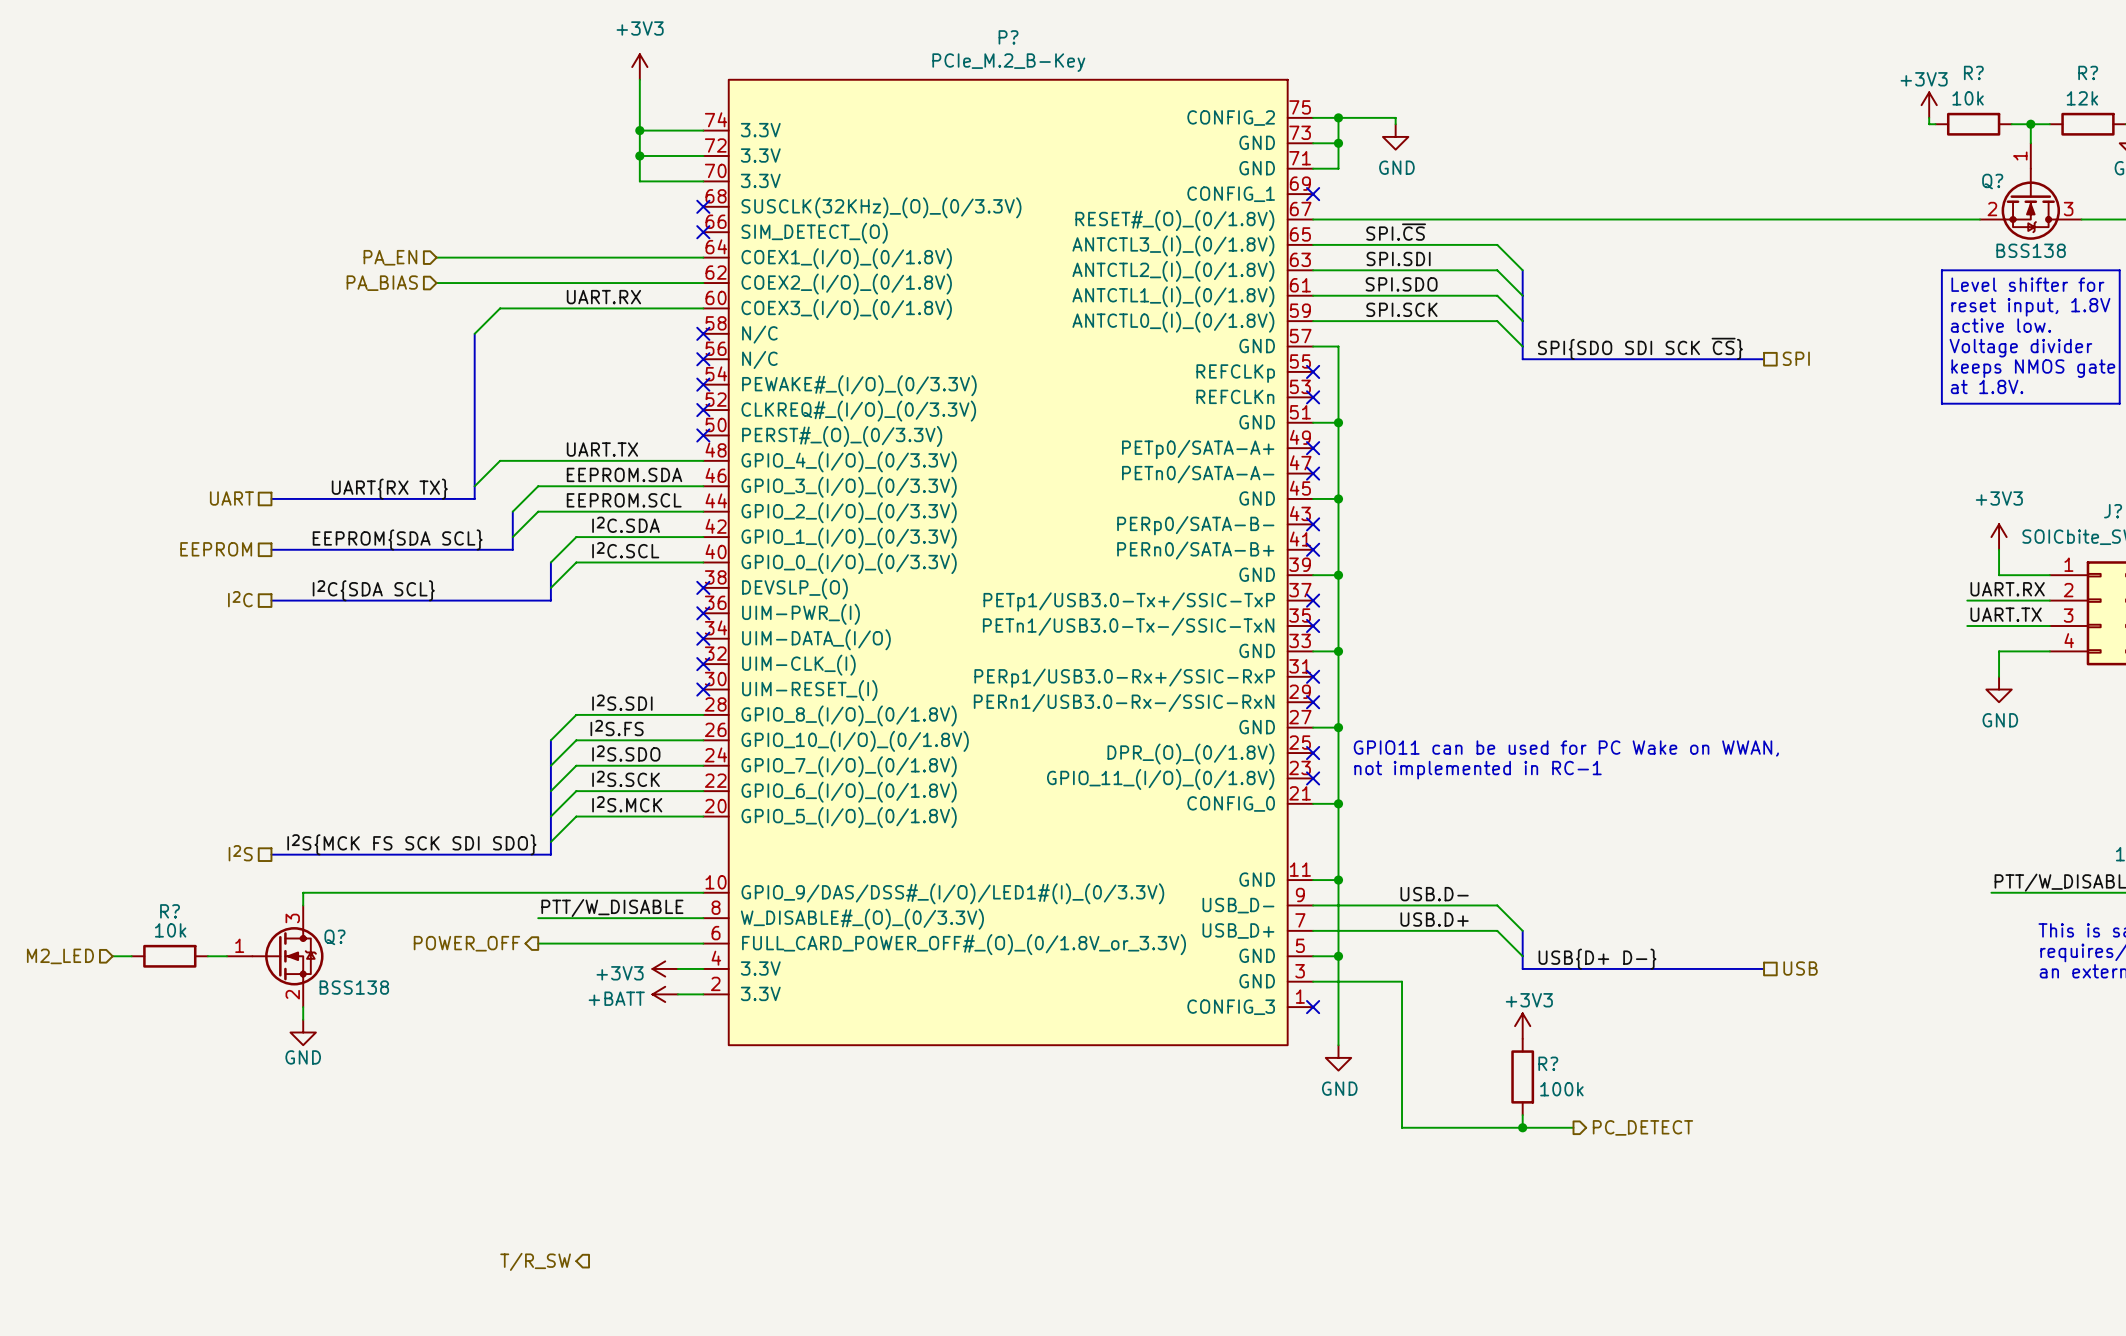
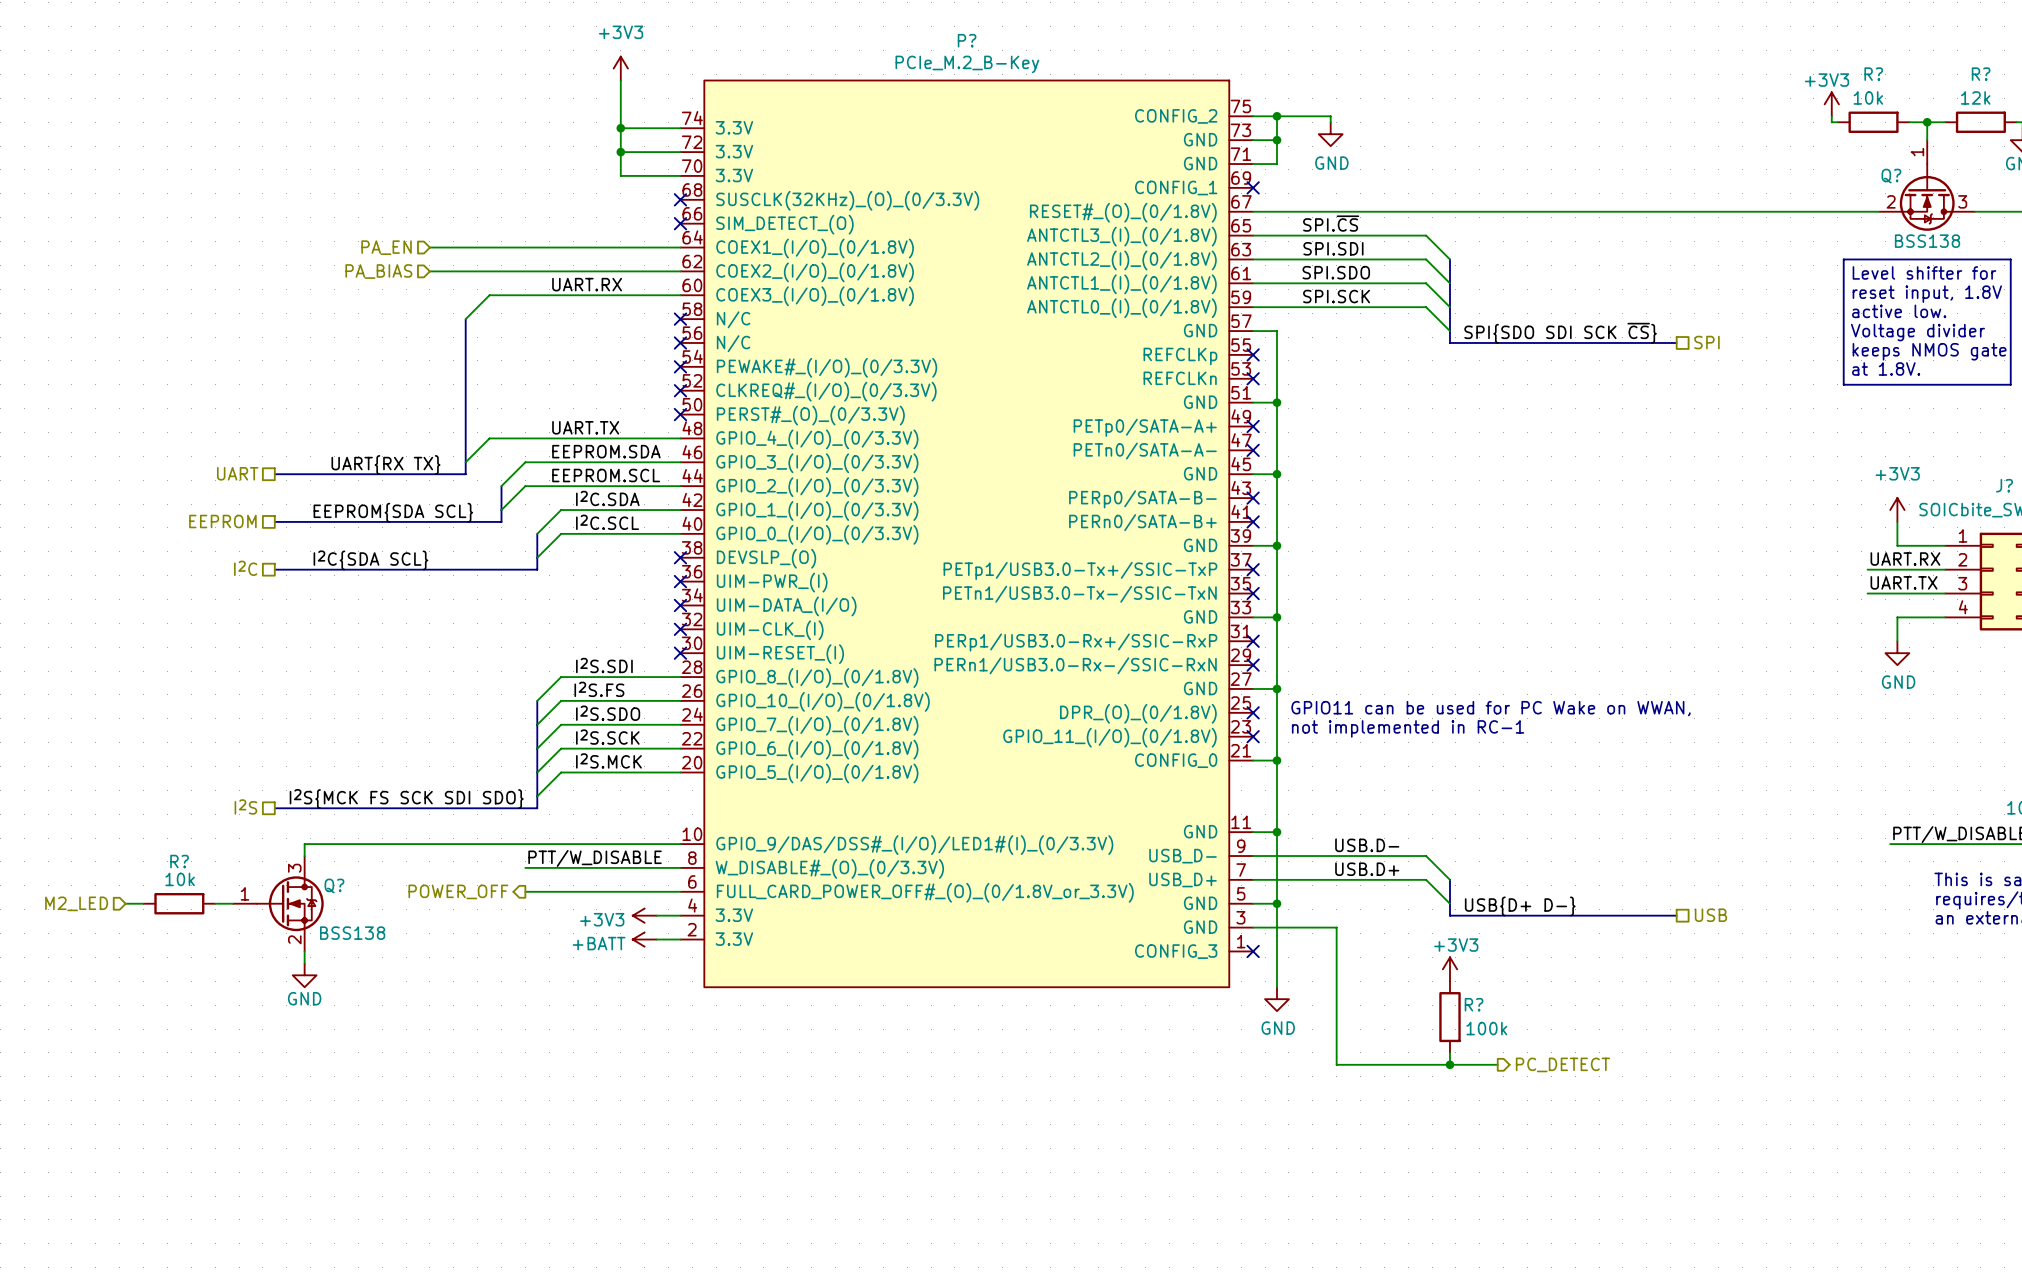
hierarchical label: T/R_SW (535, 1261) -> none

